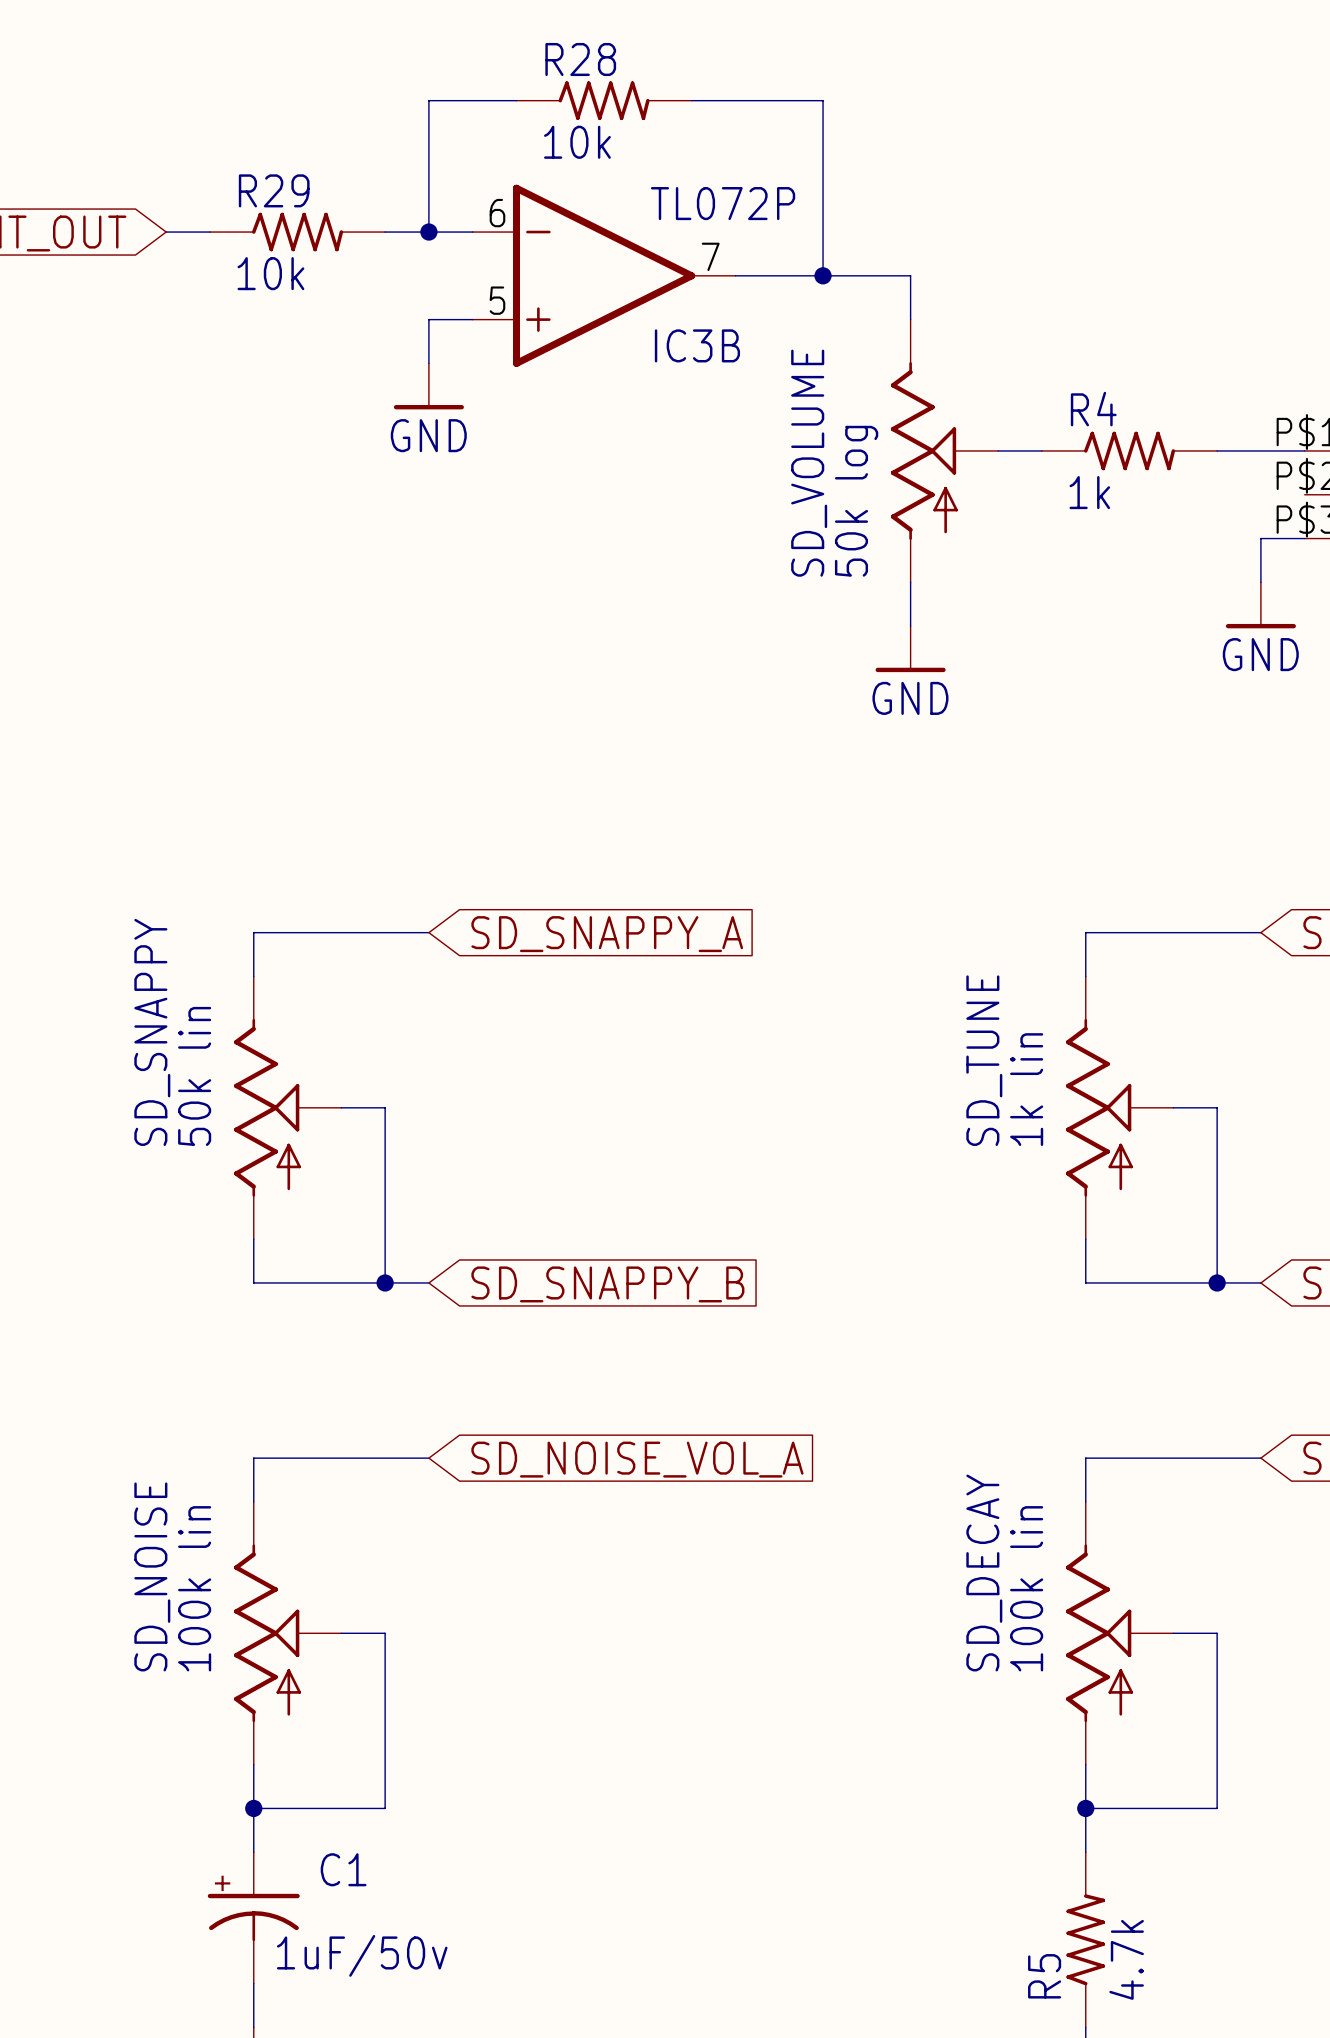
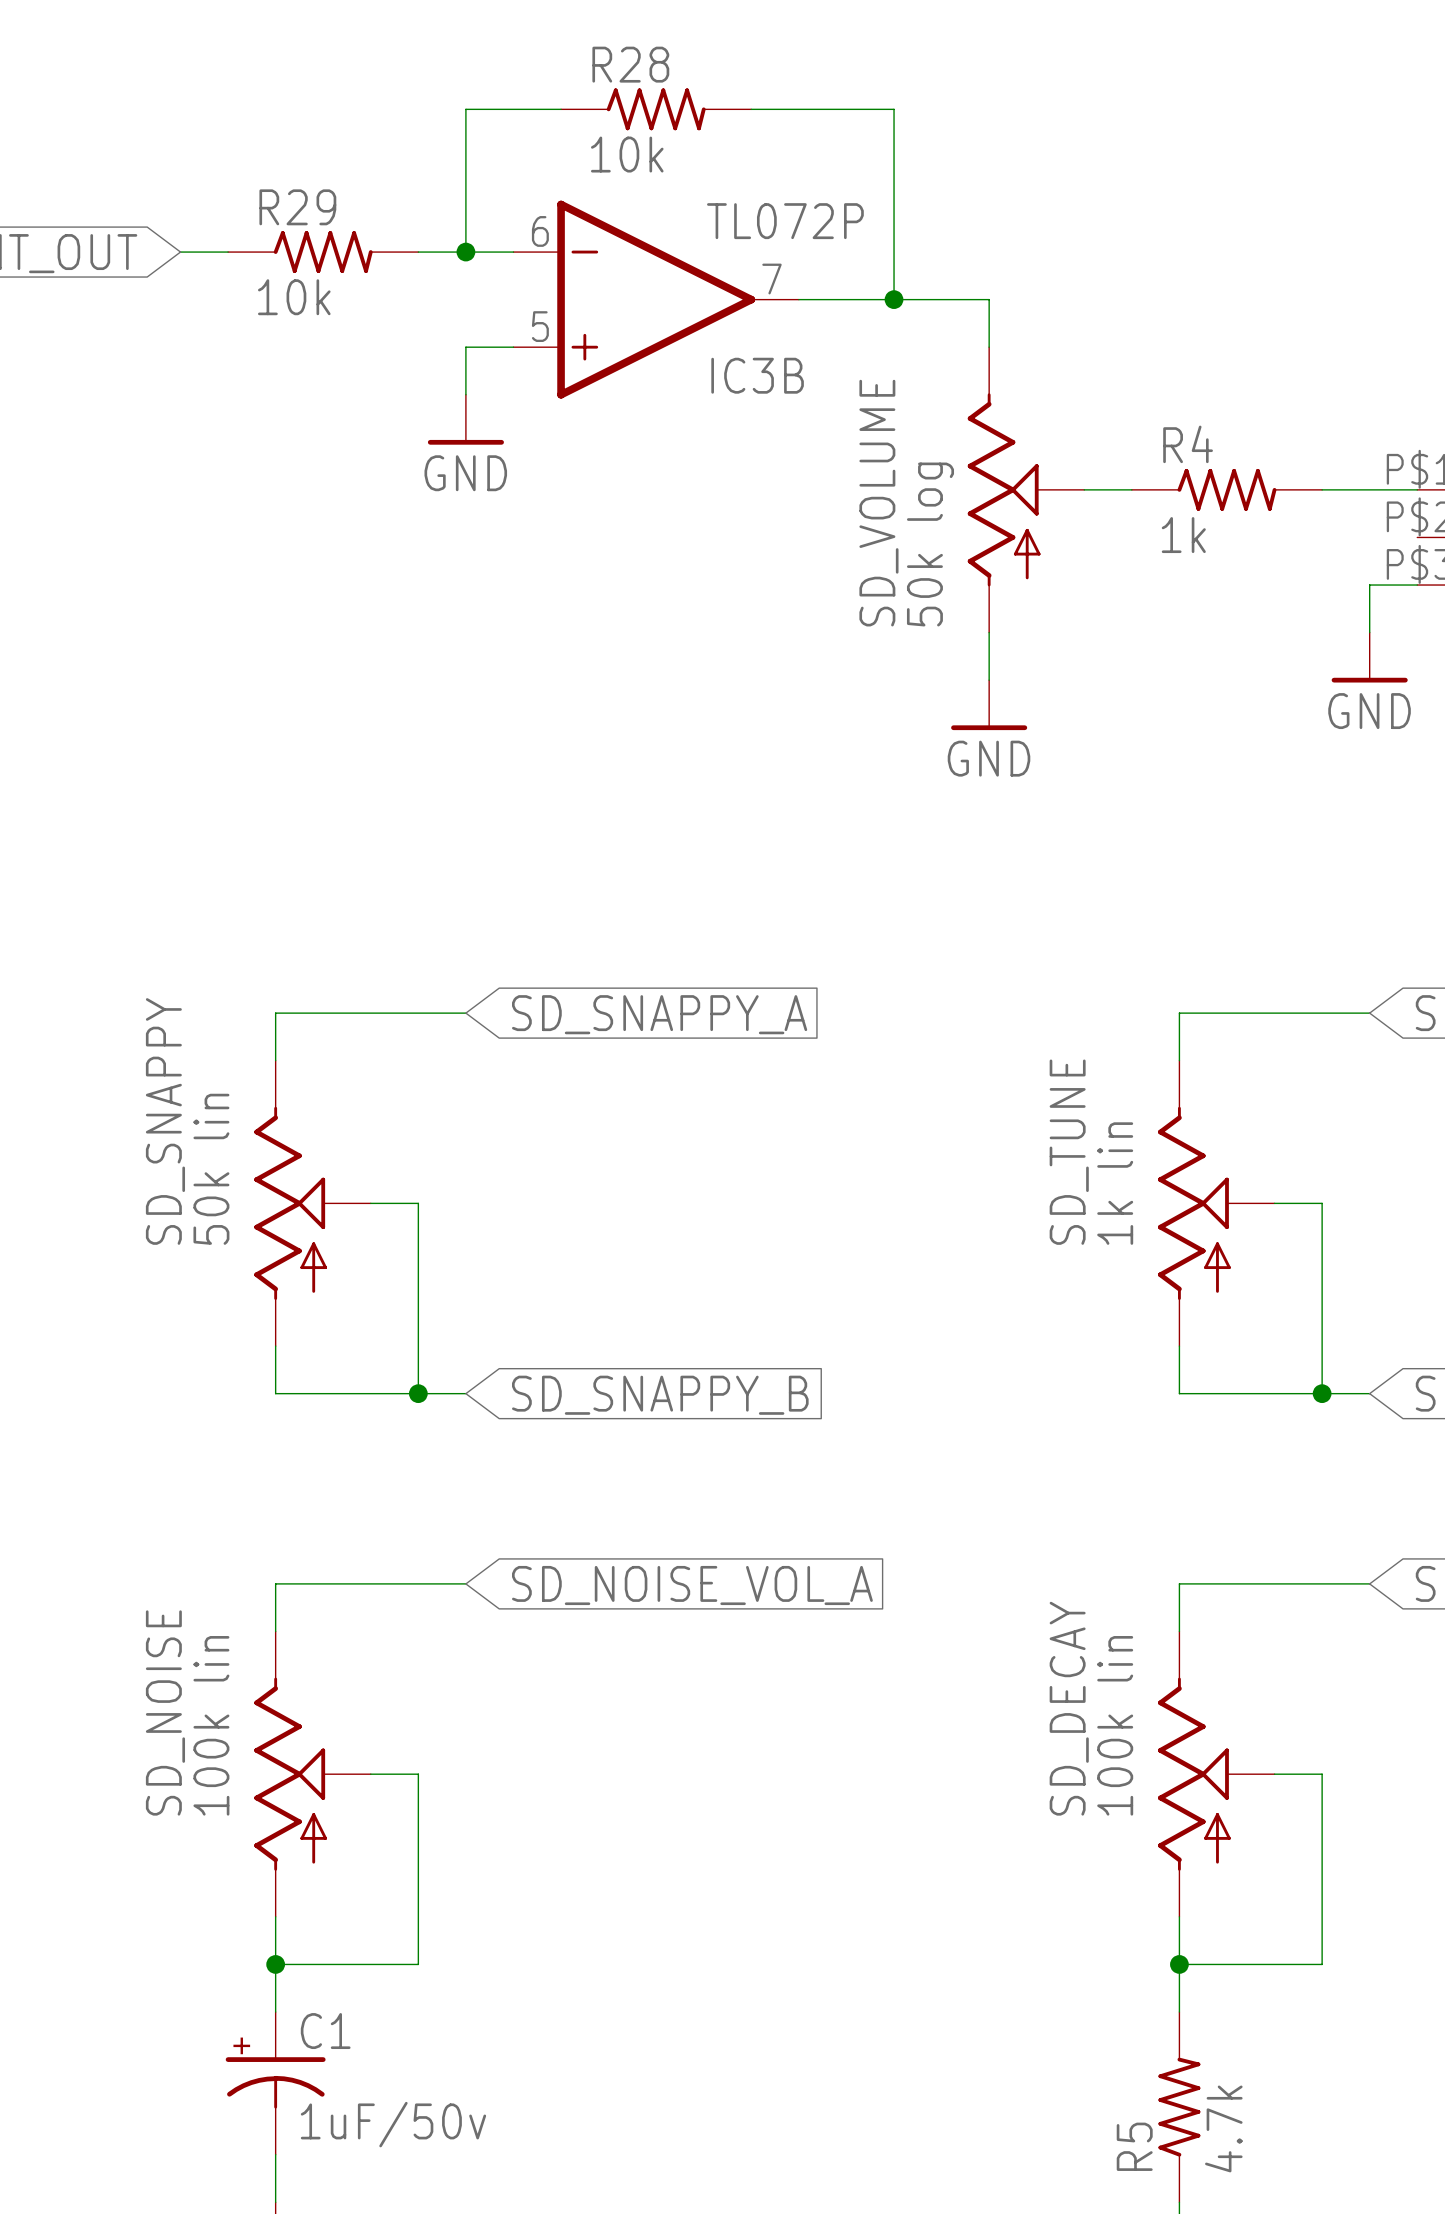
C1 name position: C1 (343, 1869) -> C1 (325, 2031)

